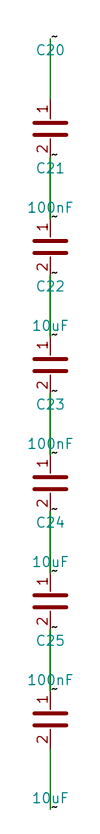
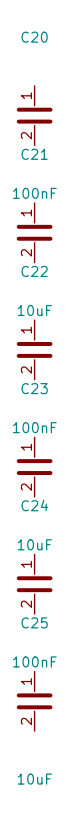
label: ~ (54, 36) -> none
wire: (50, 38) (50, 98) -> none
label: ~ (54, 154) -> none
wire: (50, 156) (50, 218) -> none
label: ~ (54, 216) -> none
label: ~ (54, 272) -> none
wire: (50, 275) (50, 336) -> none
label: ~ (54, 334) -> none
label: ~ (54, 390) -> none
wire: (50, 393) (50, 455) -> none
label: ~ (54, 452) -> none
label: ~ (54, 508) -> none
wire: (50, 511) (50, 573) -> none
label: ~ (54, 570) -> none
label: ~ (54, 627) -> none
wire: (50, 629) (50, 691) -> none
label: ~ (54, 688) -> none
wire: (50, 749) (50, 809) -> none
label: ~ (54, 807) -> none

